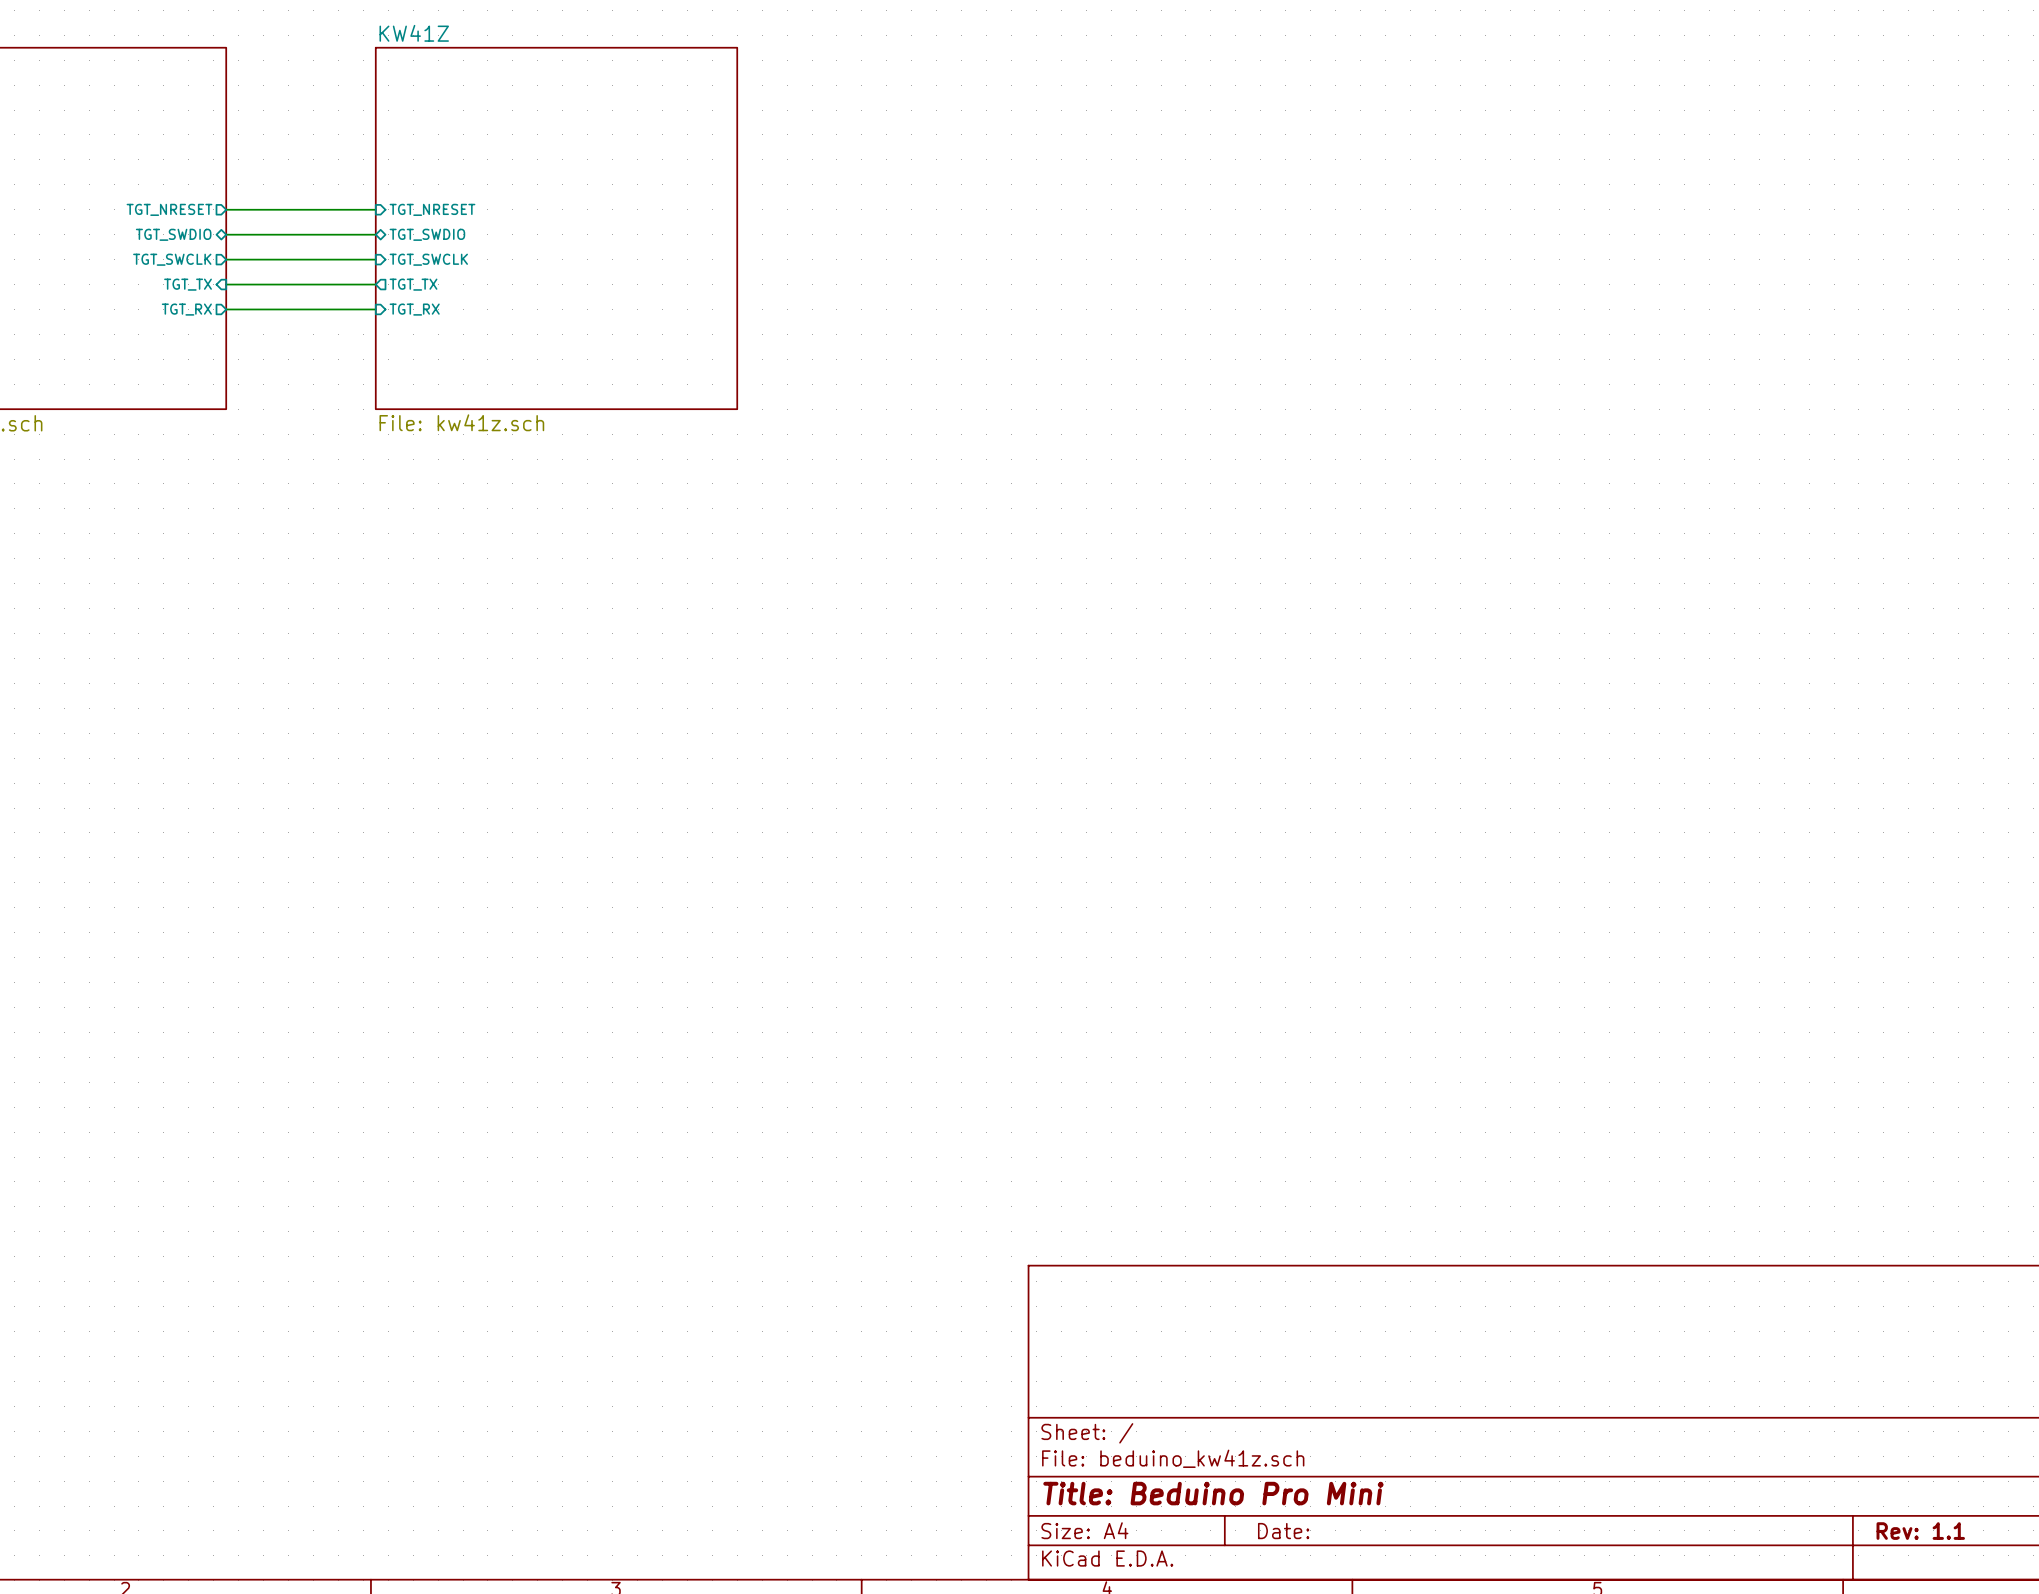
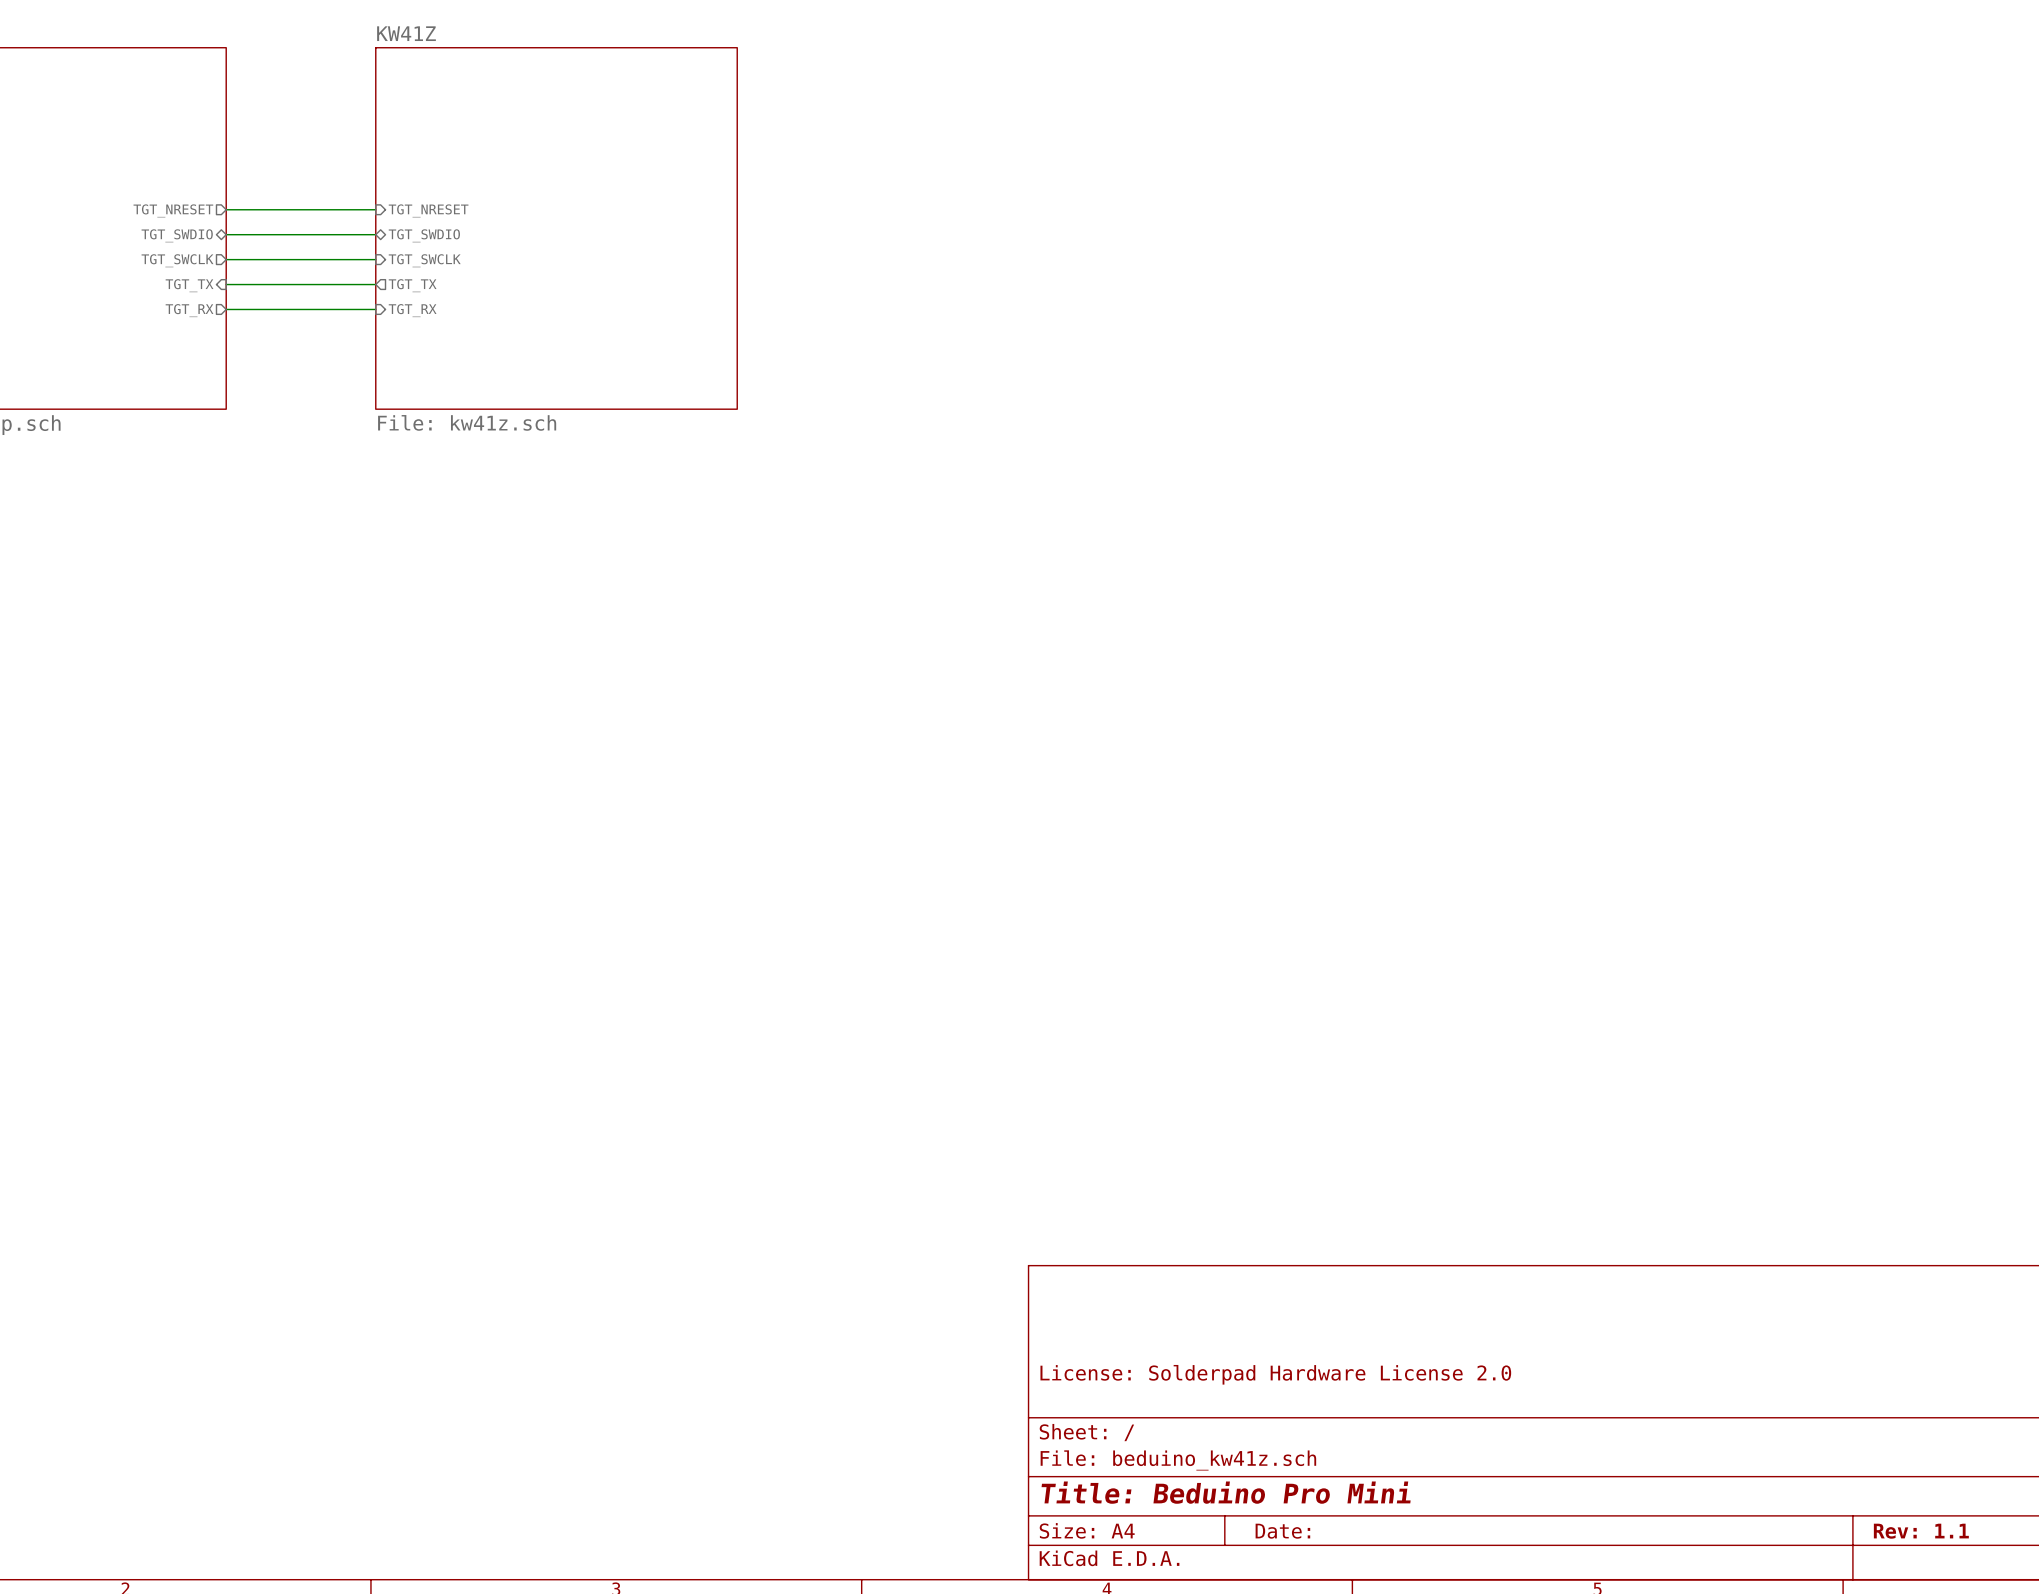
title block: none -> License: Solderpad Hardware License 2.0 (1275, 1374)

